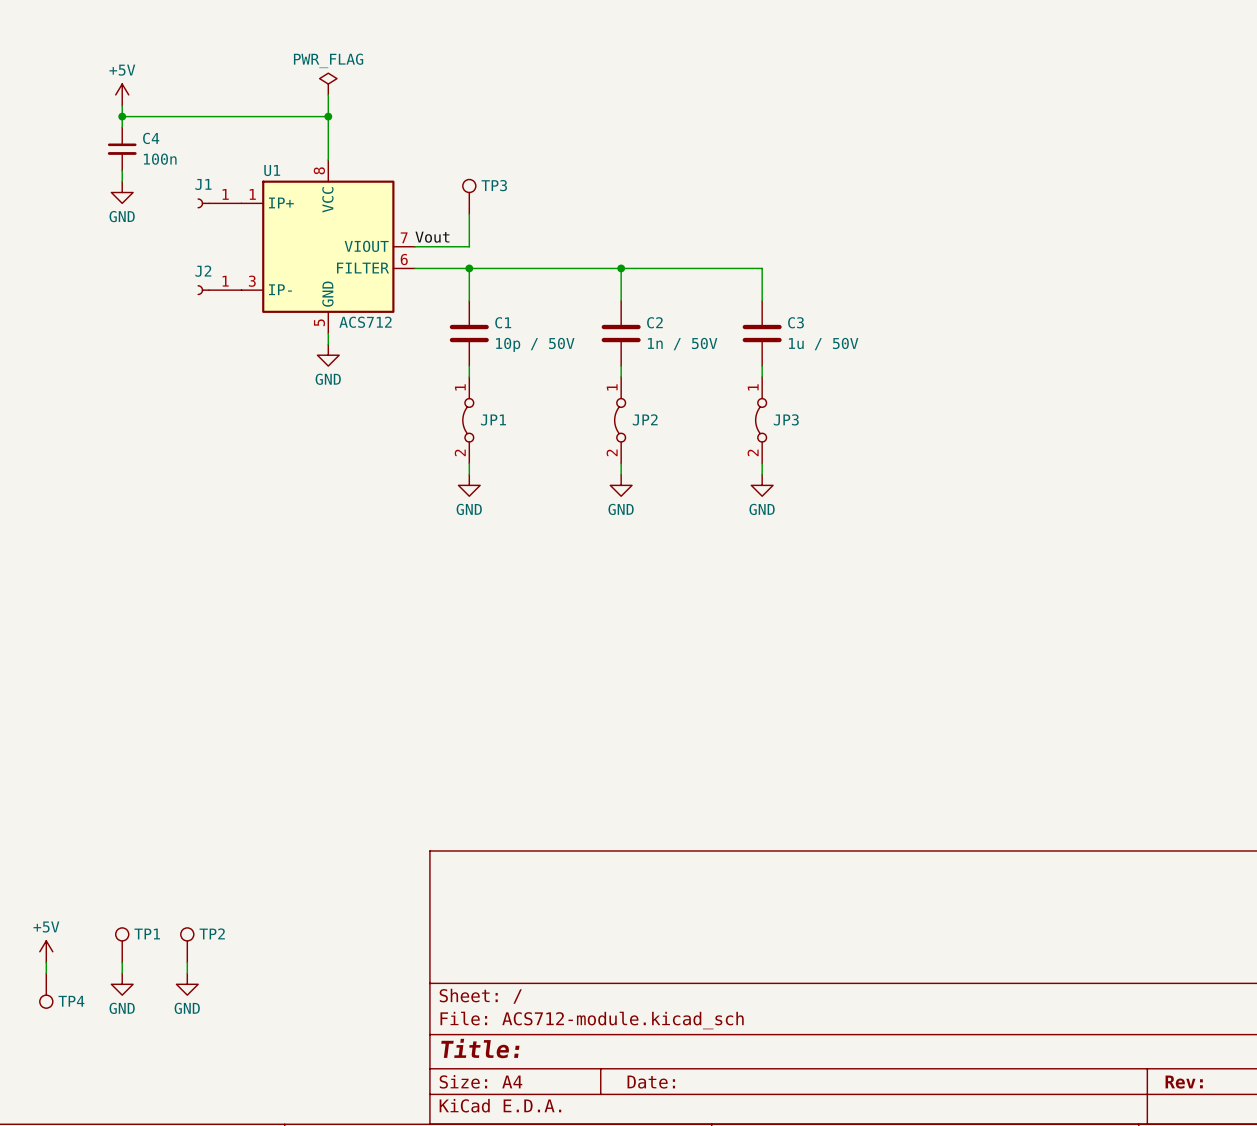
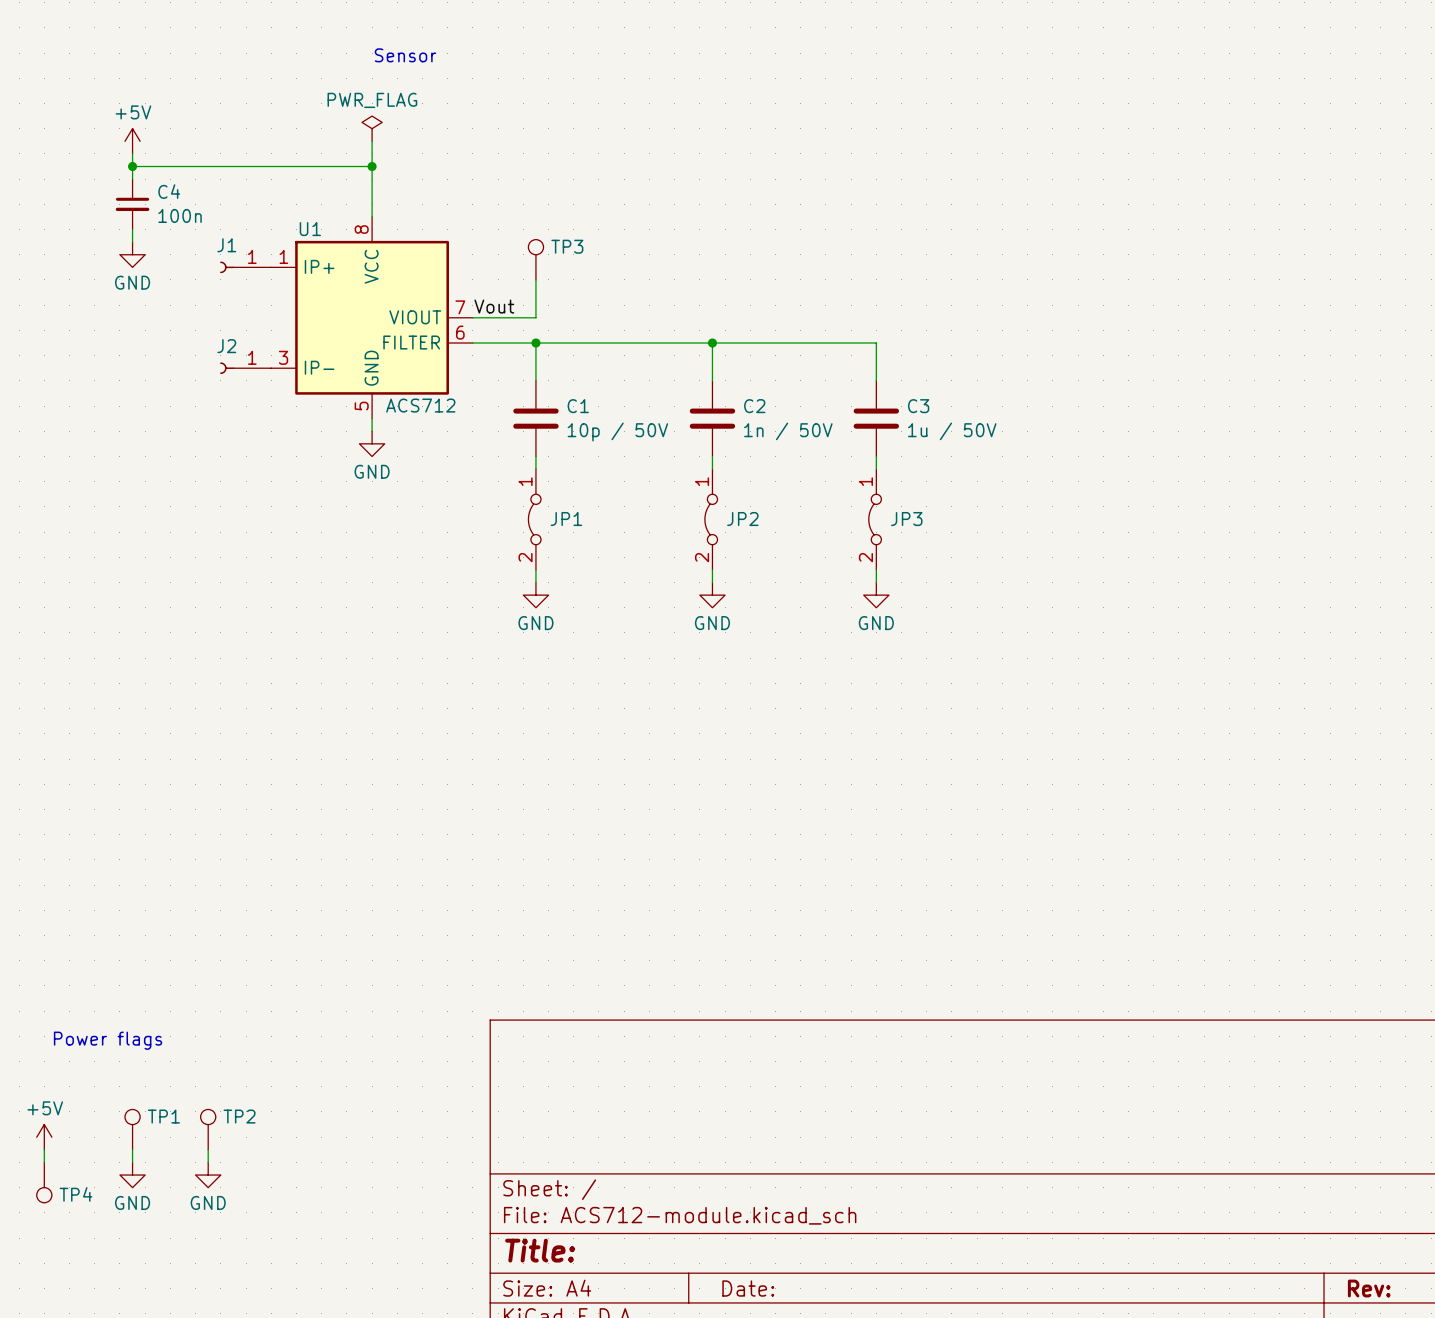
text: none -> Sensor (405, 55)
text: none -> Power flags (108, 1040)

